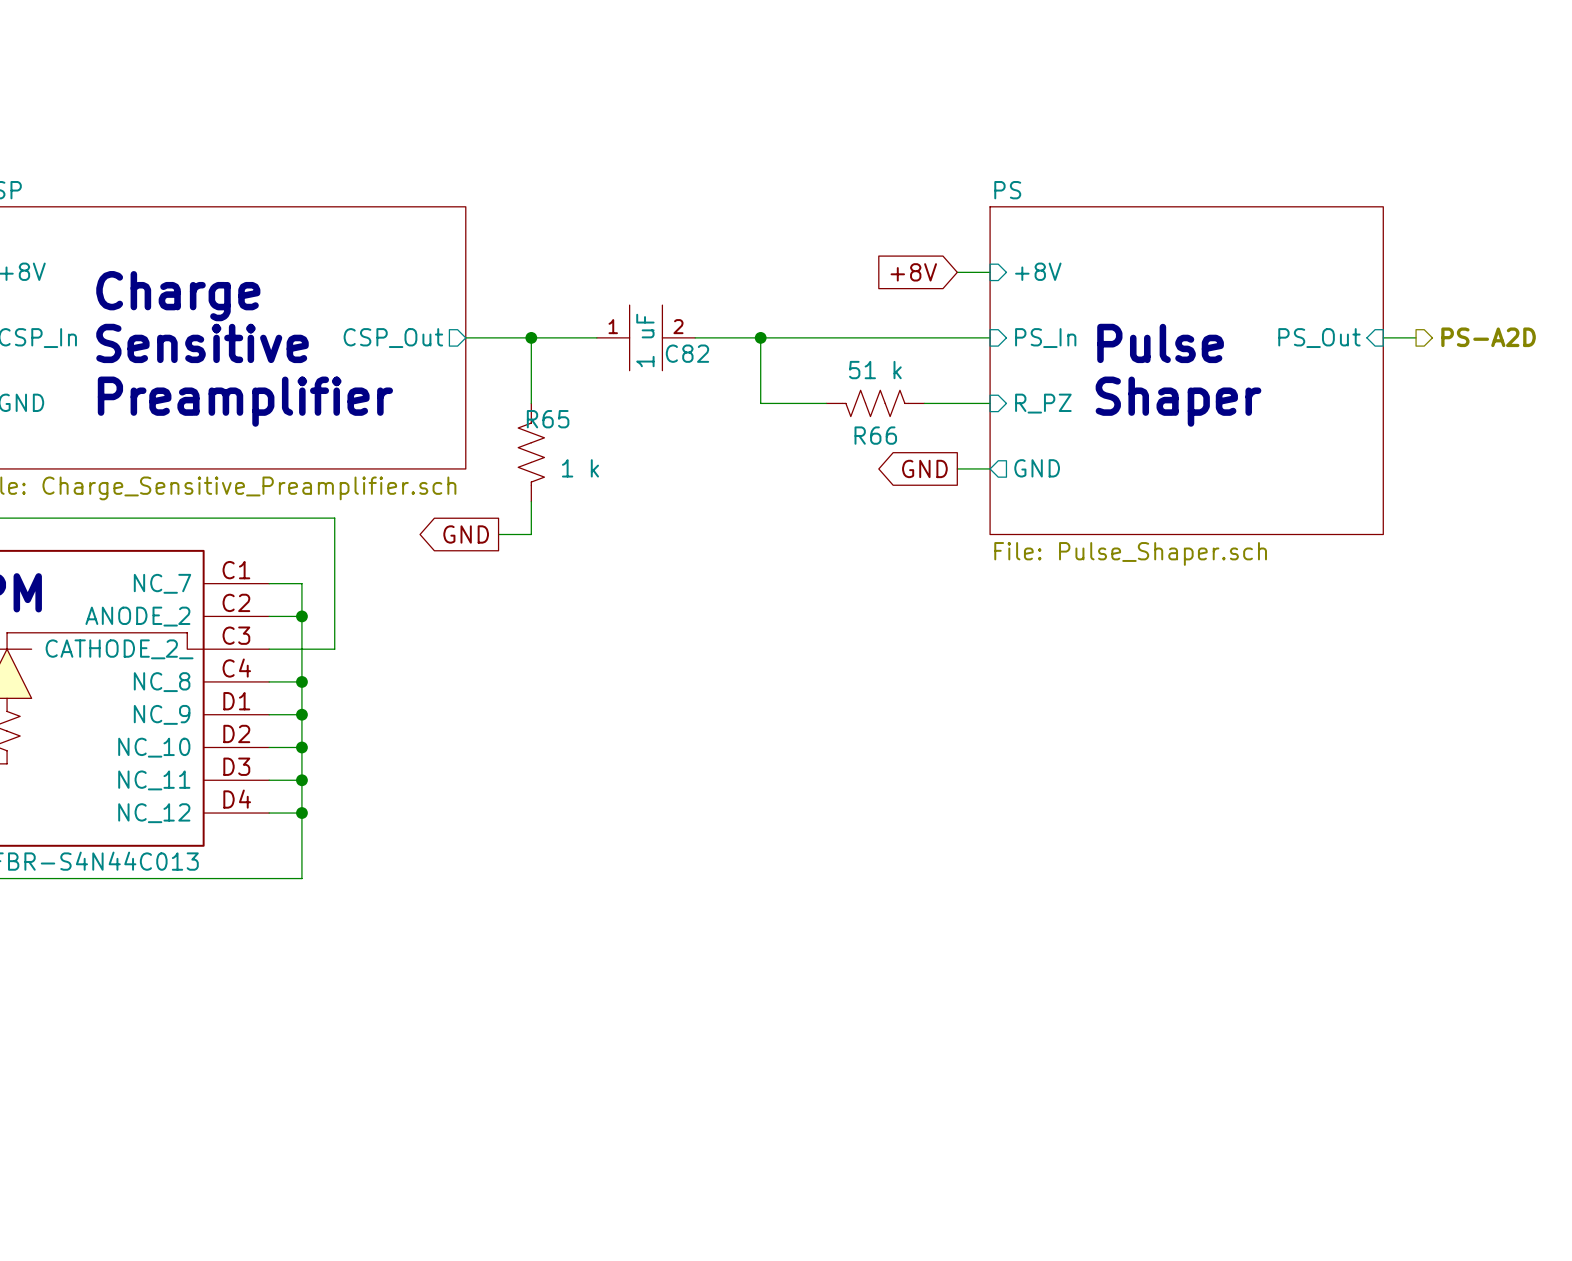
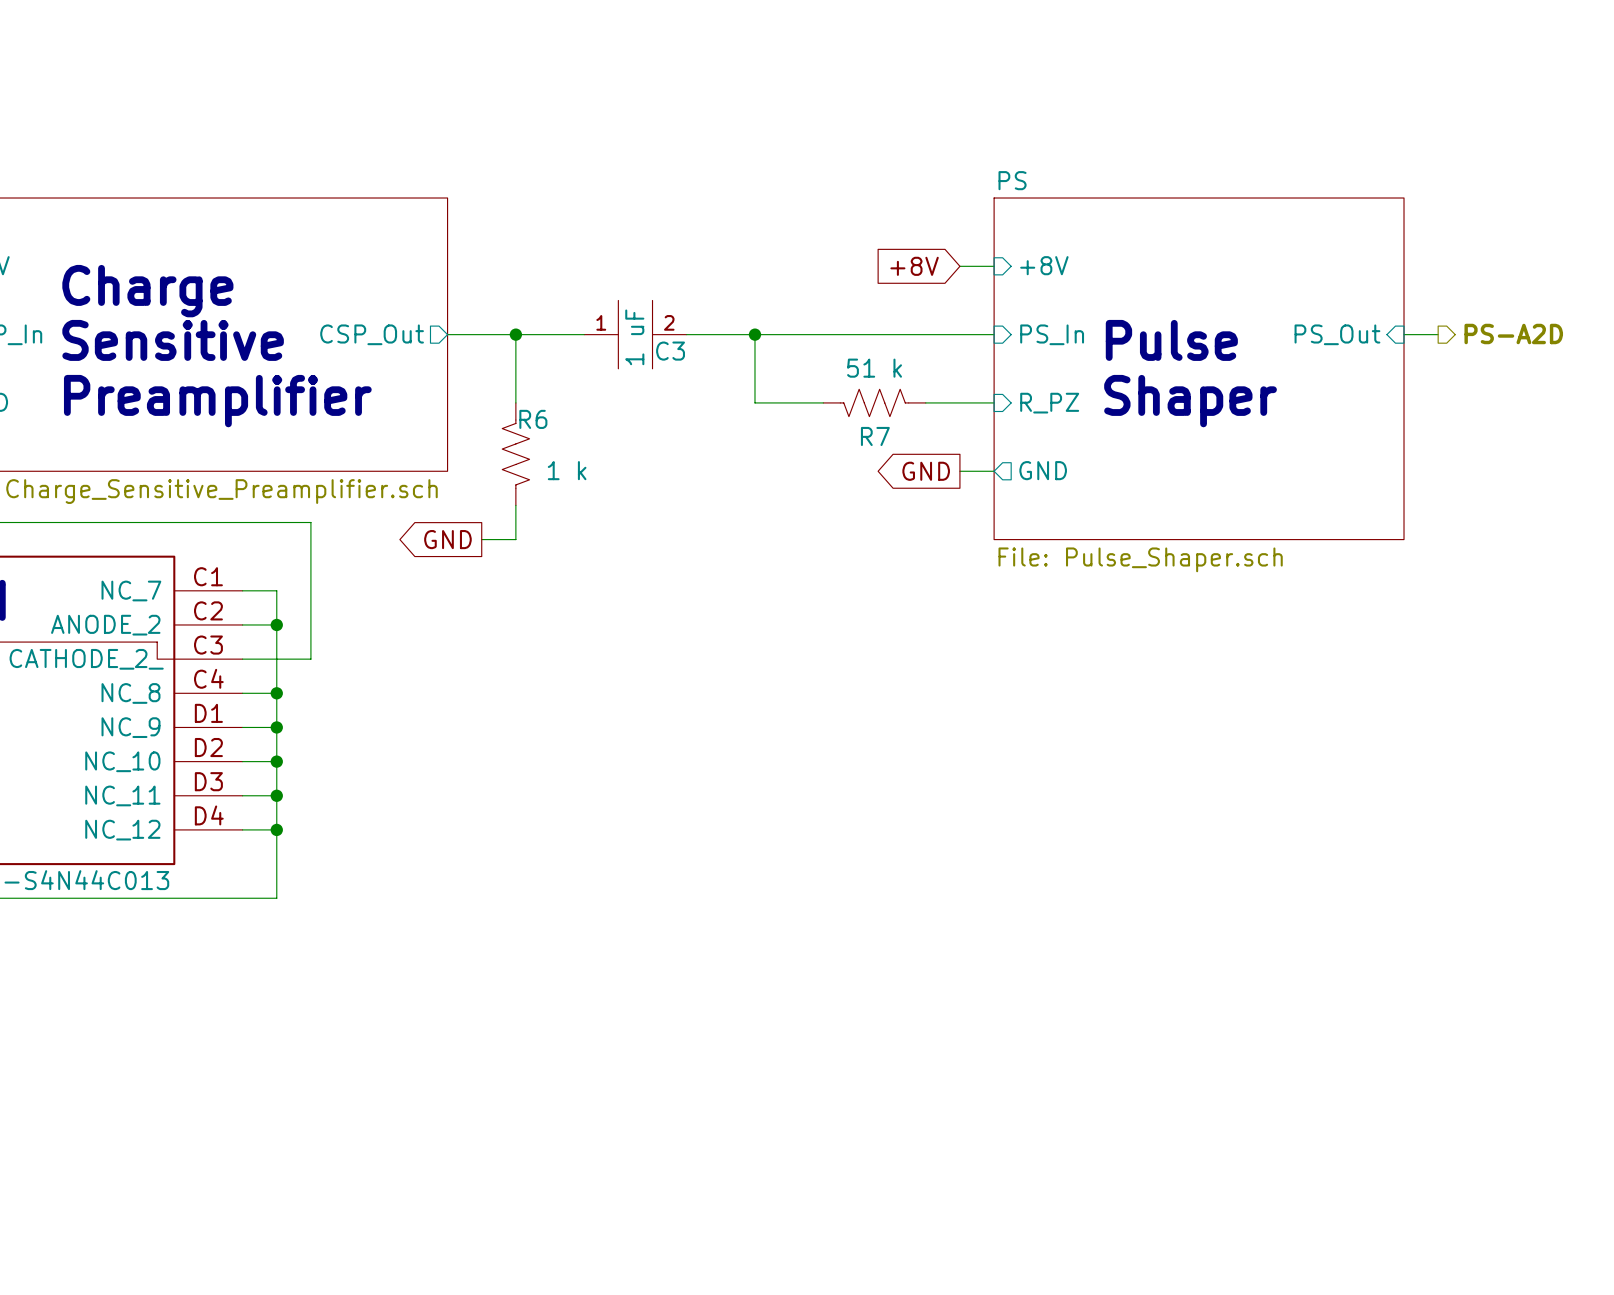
C82 name: C82 (687, 353) -> C3 (670, 351)
R65 name: R65 (548, 419) -> R6 (533, 419)
R66 name: R66 (875, 435) -> R7 (875, 436)

